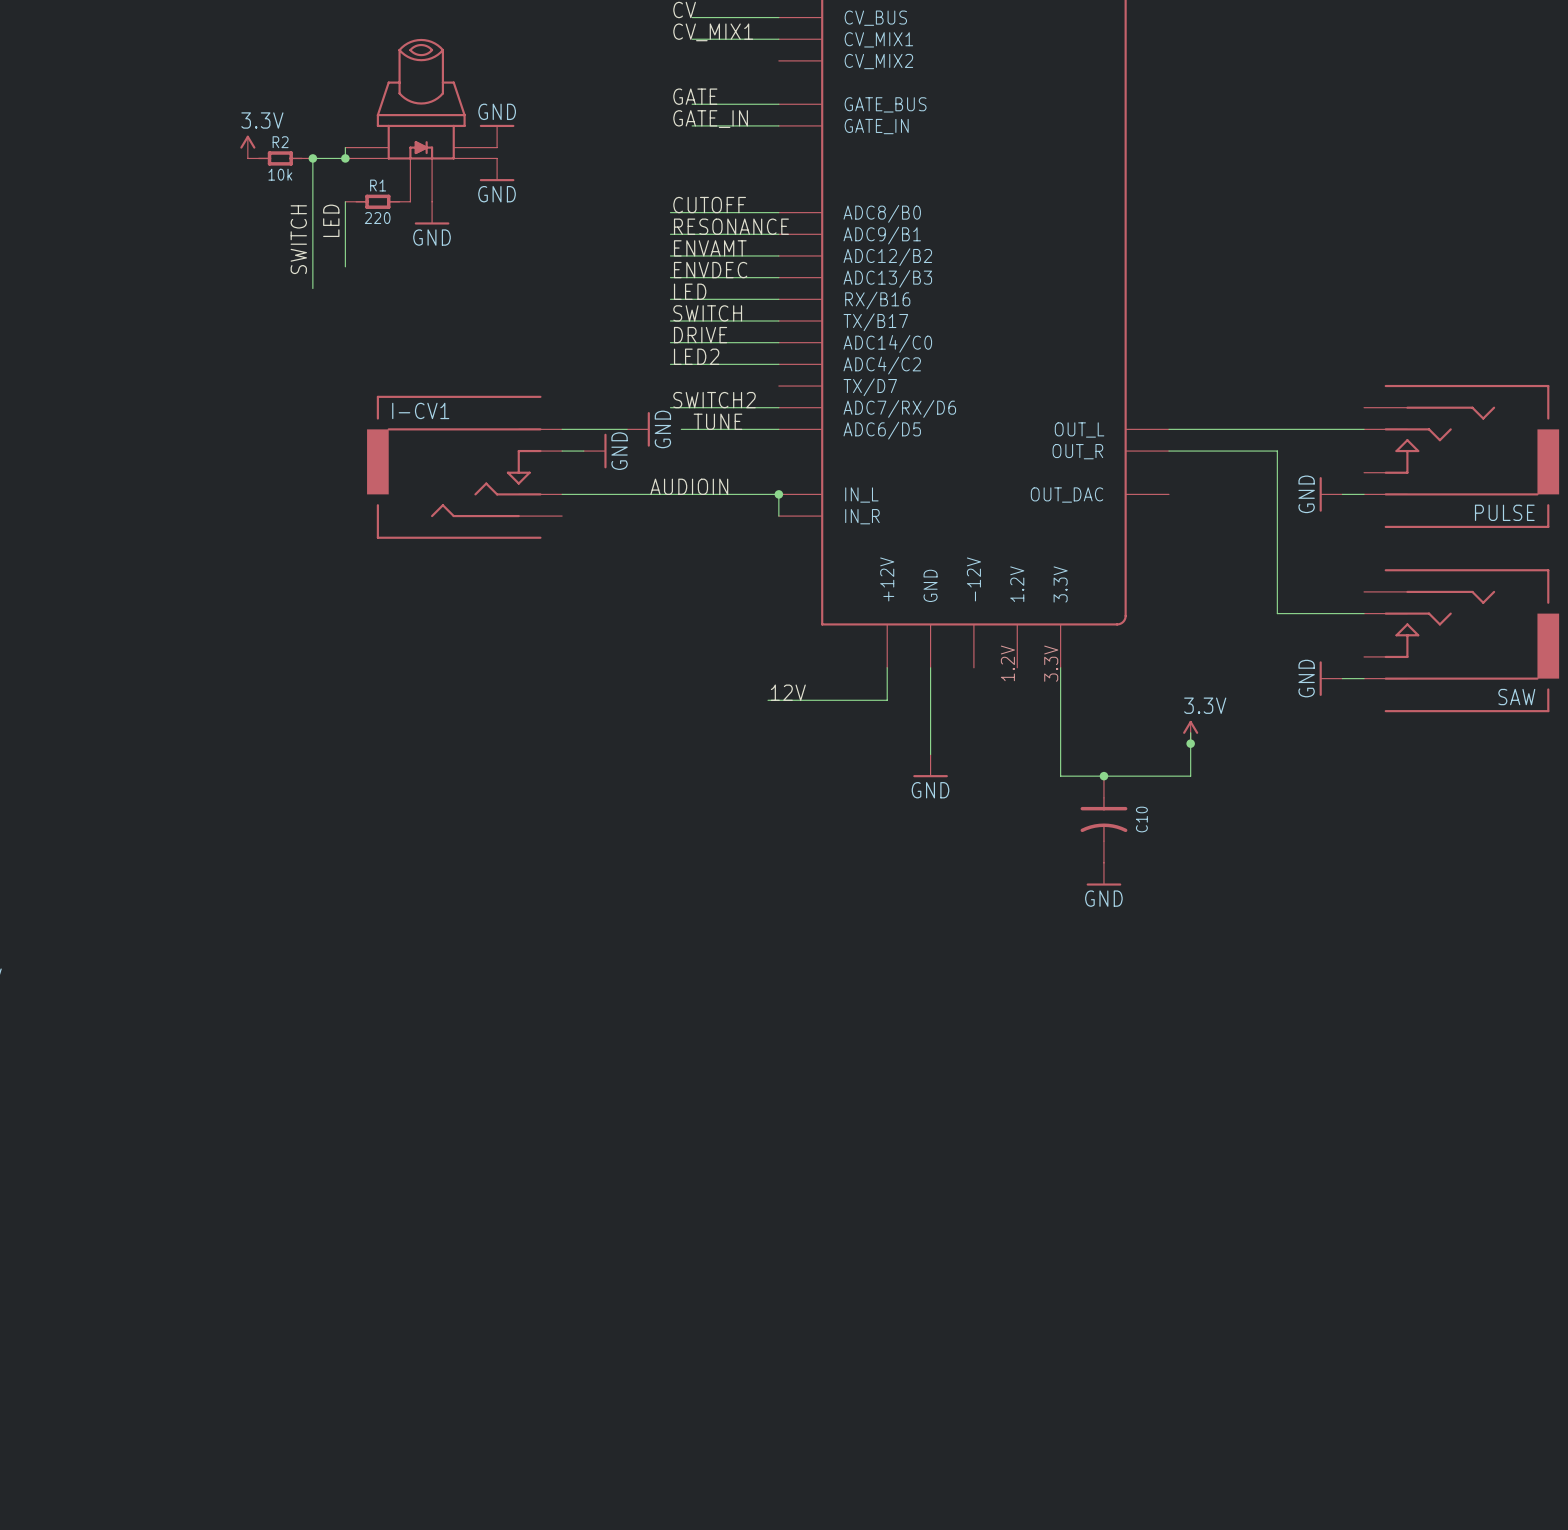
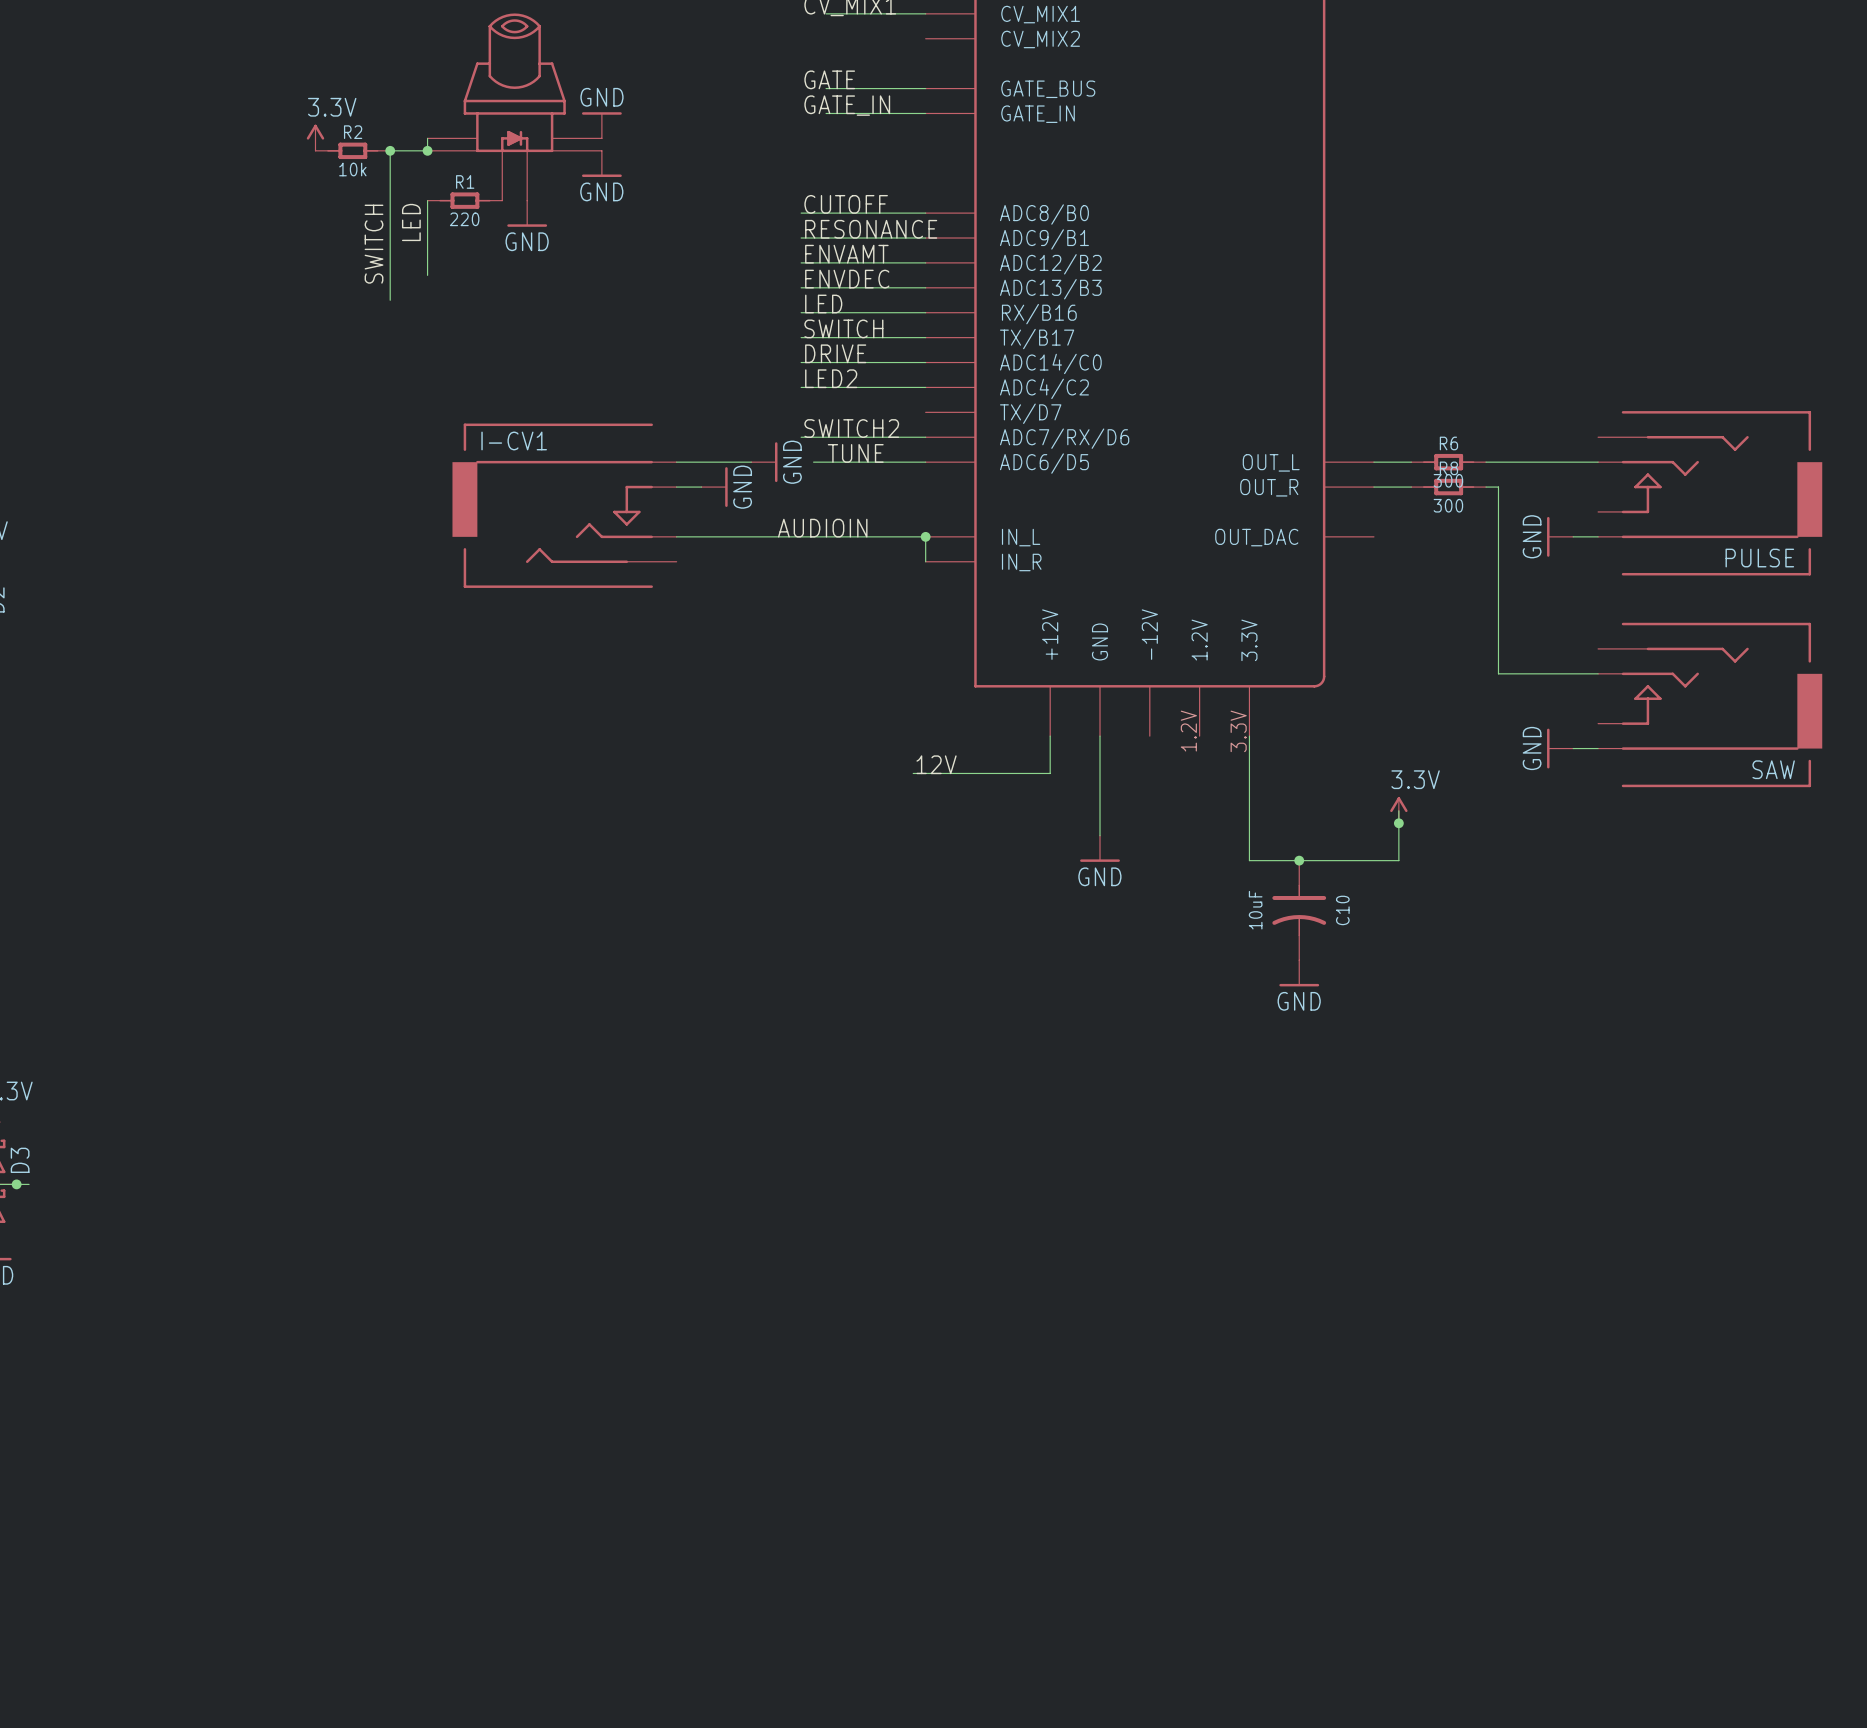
R6: none -> 300 (1448, 462)
R8: none -> 300 (1448, 487)
C10 value: none -> 10uF (1255, 910)

